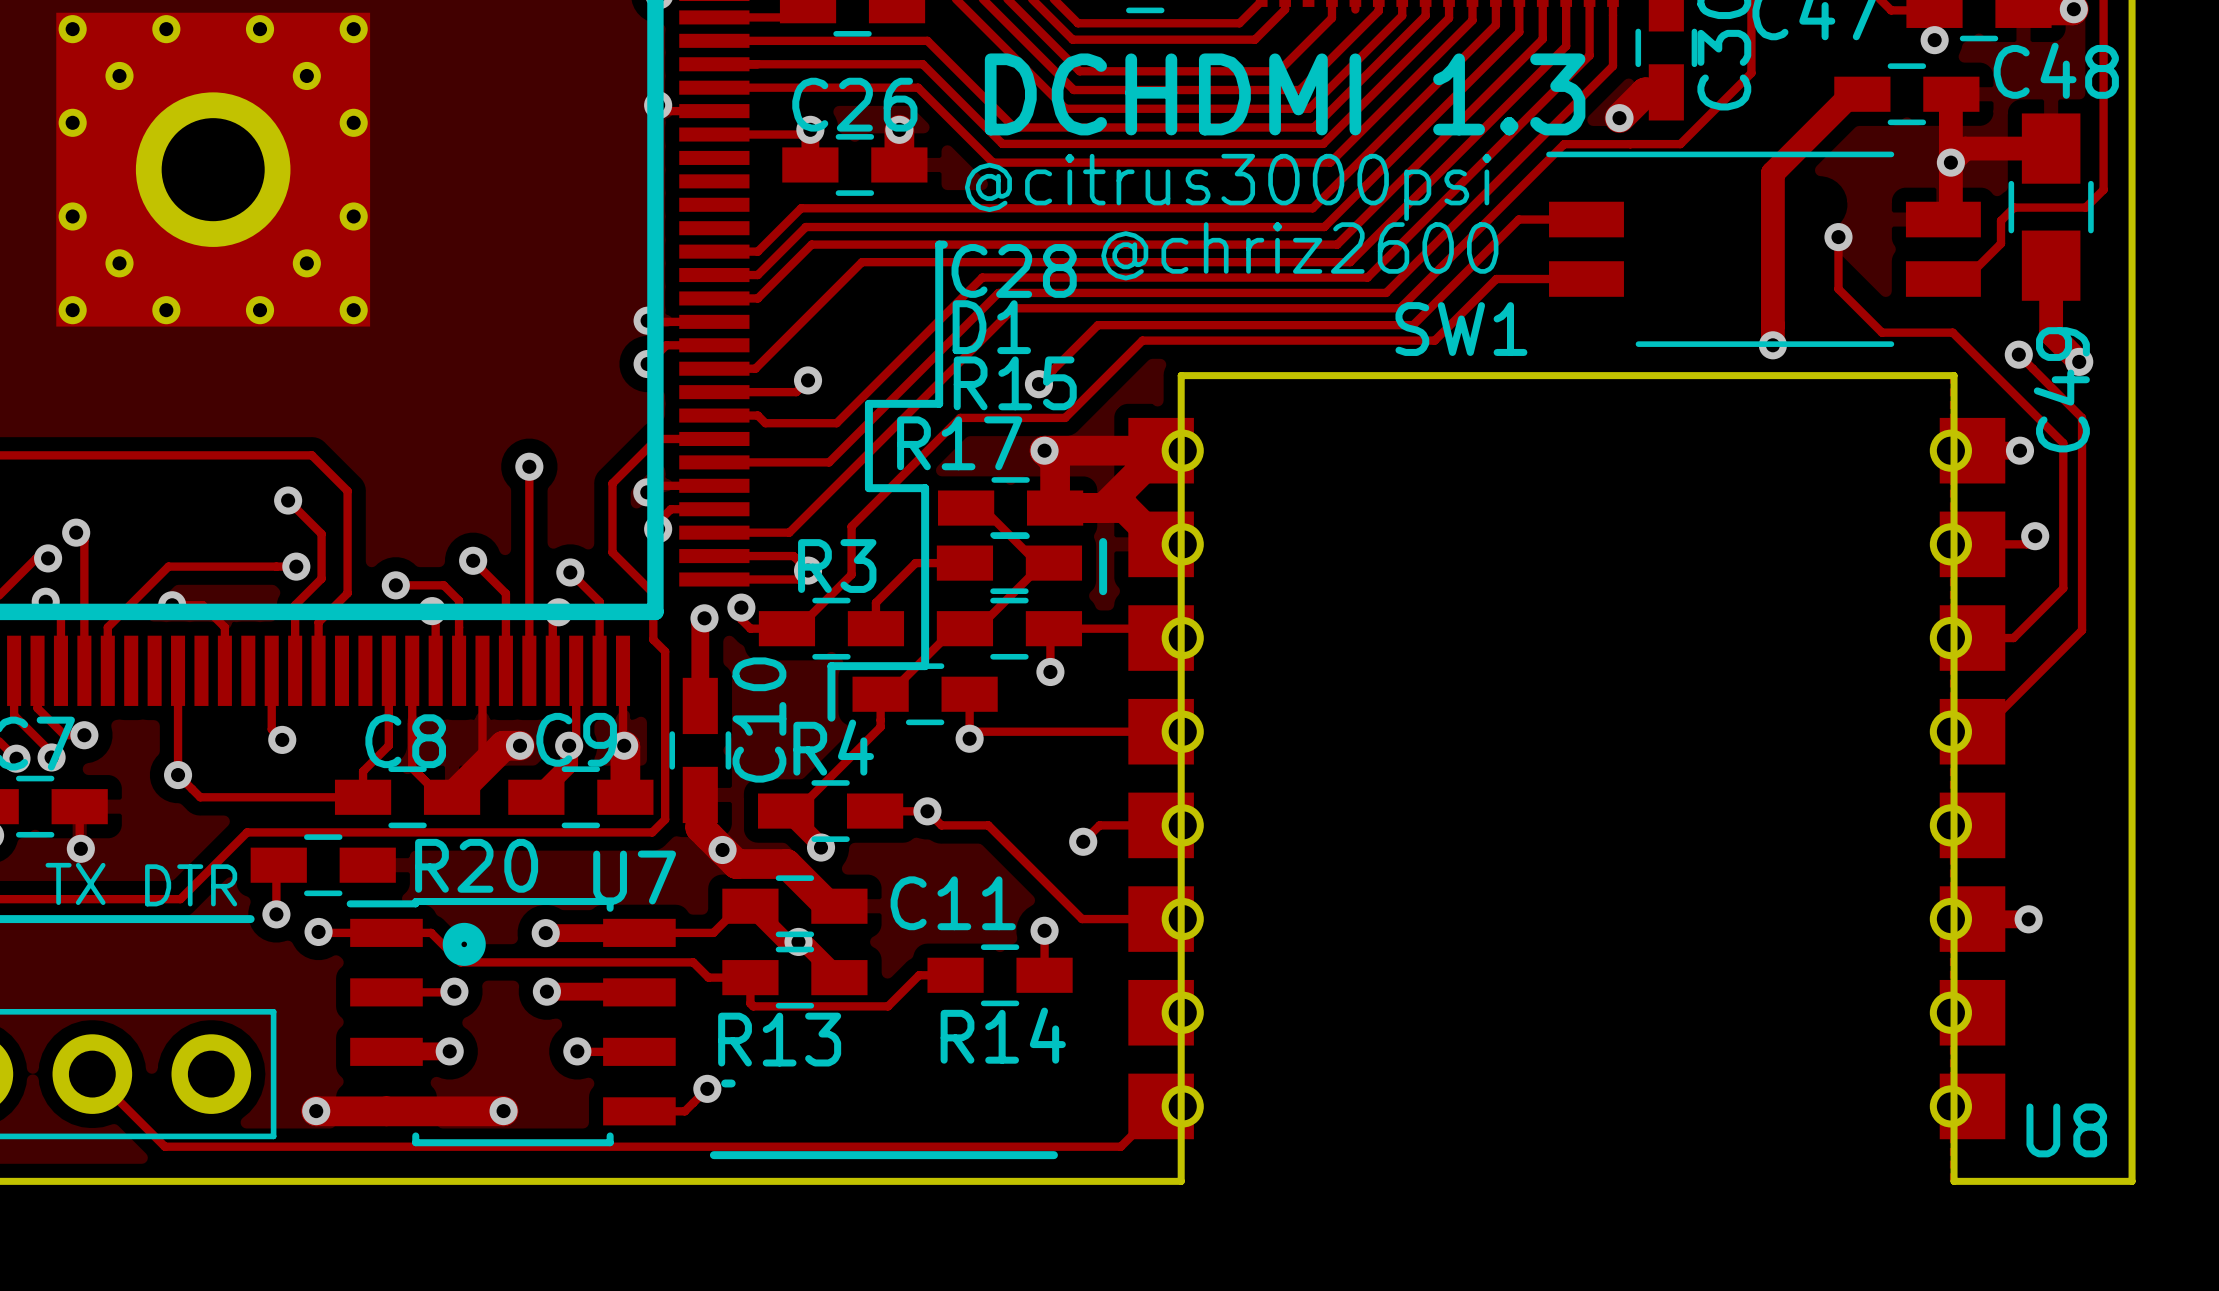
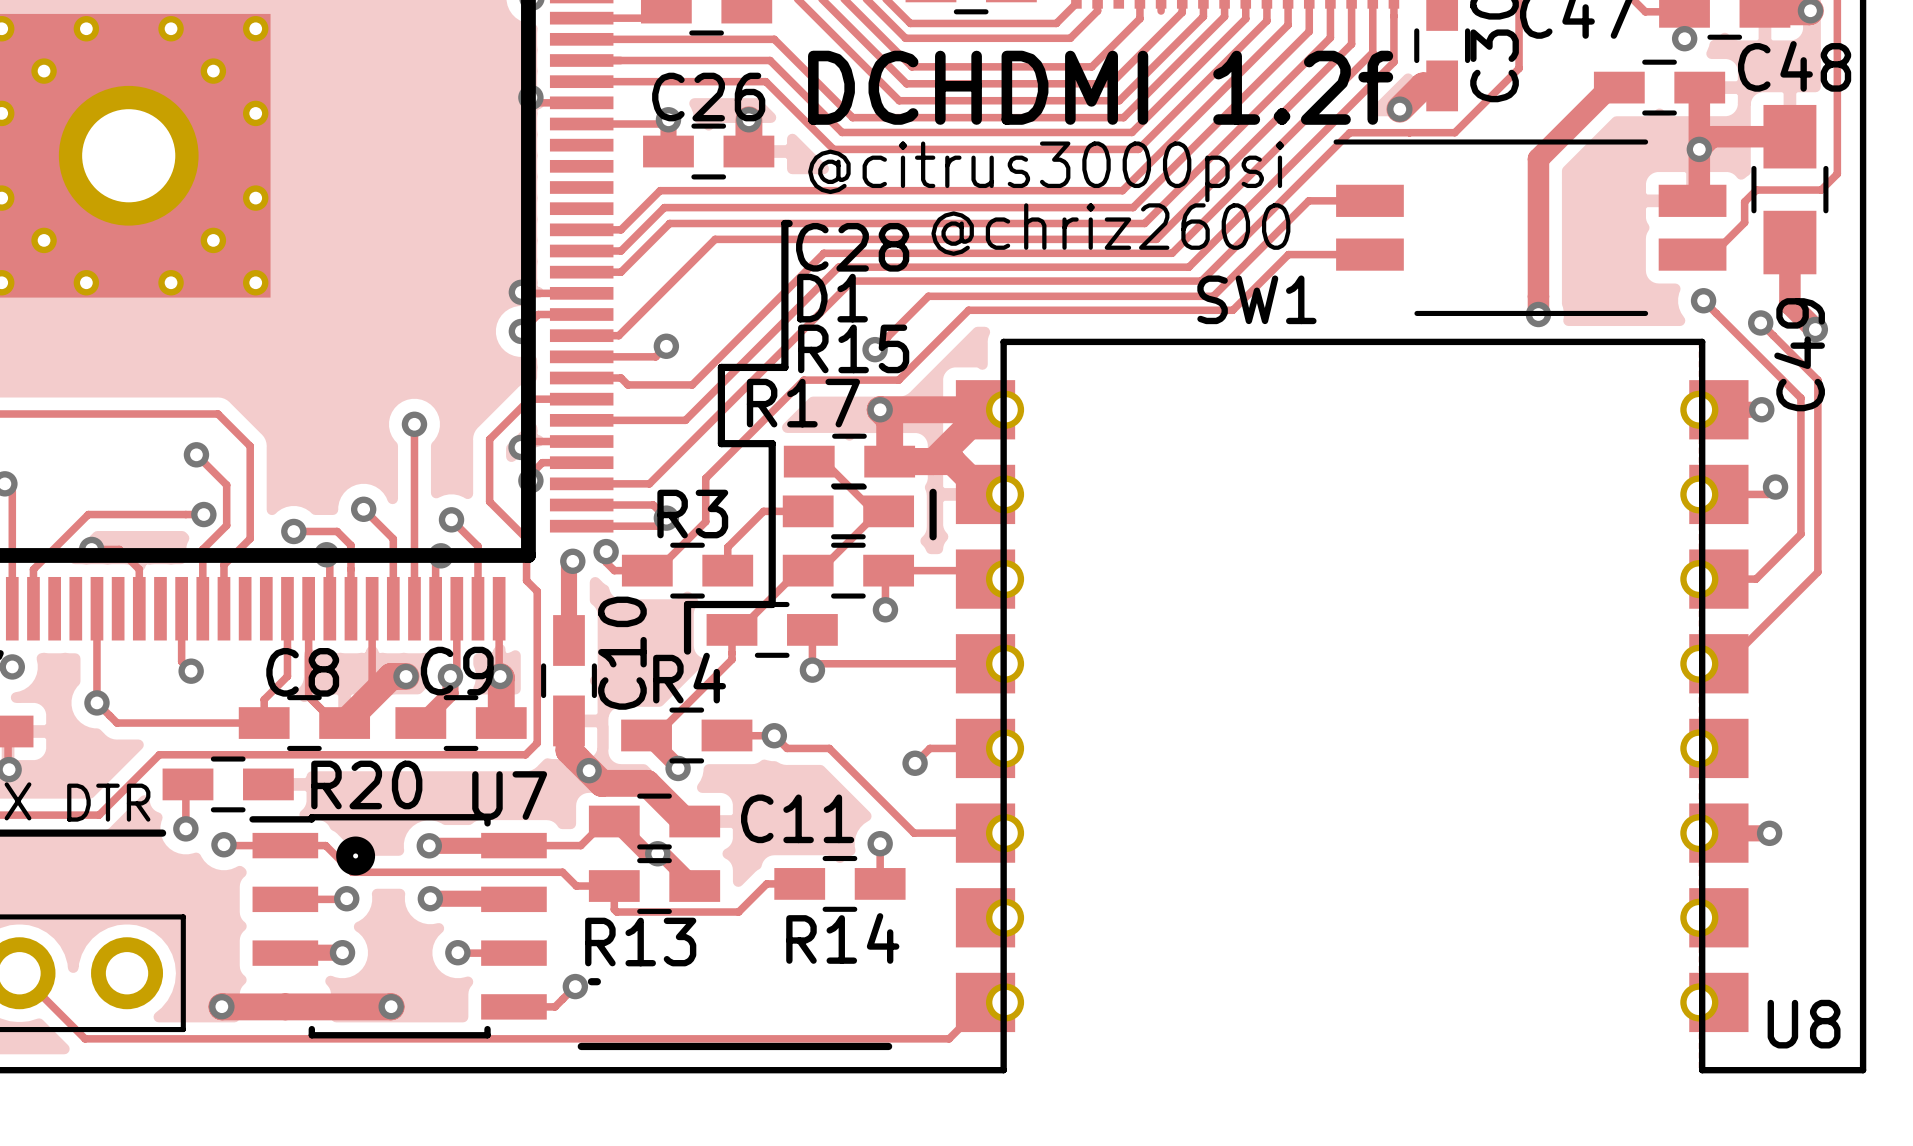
text: DCHDMI 1.3 (1285, 94) -> DCHDMI 1.2f (1100, 87)
track: (1838, 237) (1838, 289) (1882, 332) (1952, 332) (2063, 443) -> (1703, 300) (1800, 398) (1800, 402)
via position: (1838, 237) -> (1703, 300)

